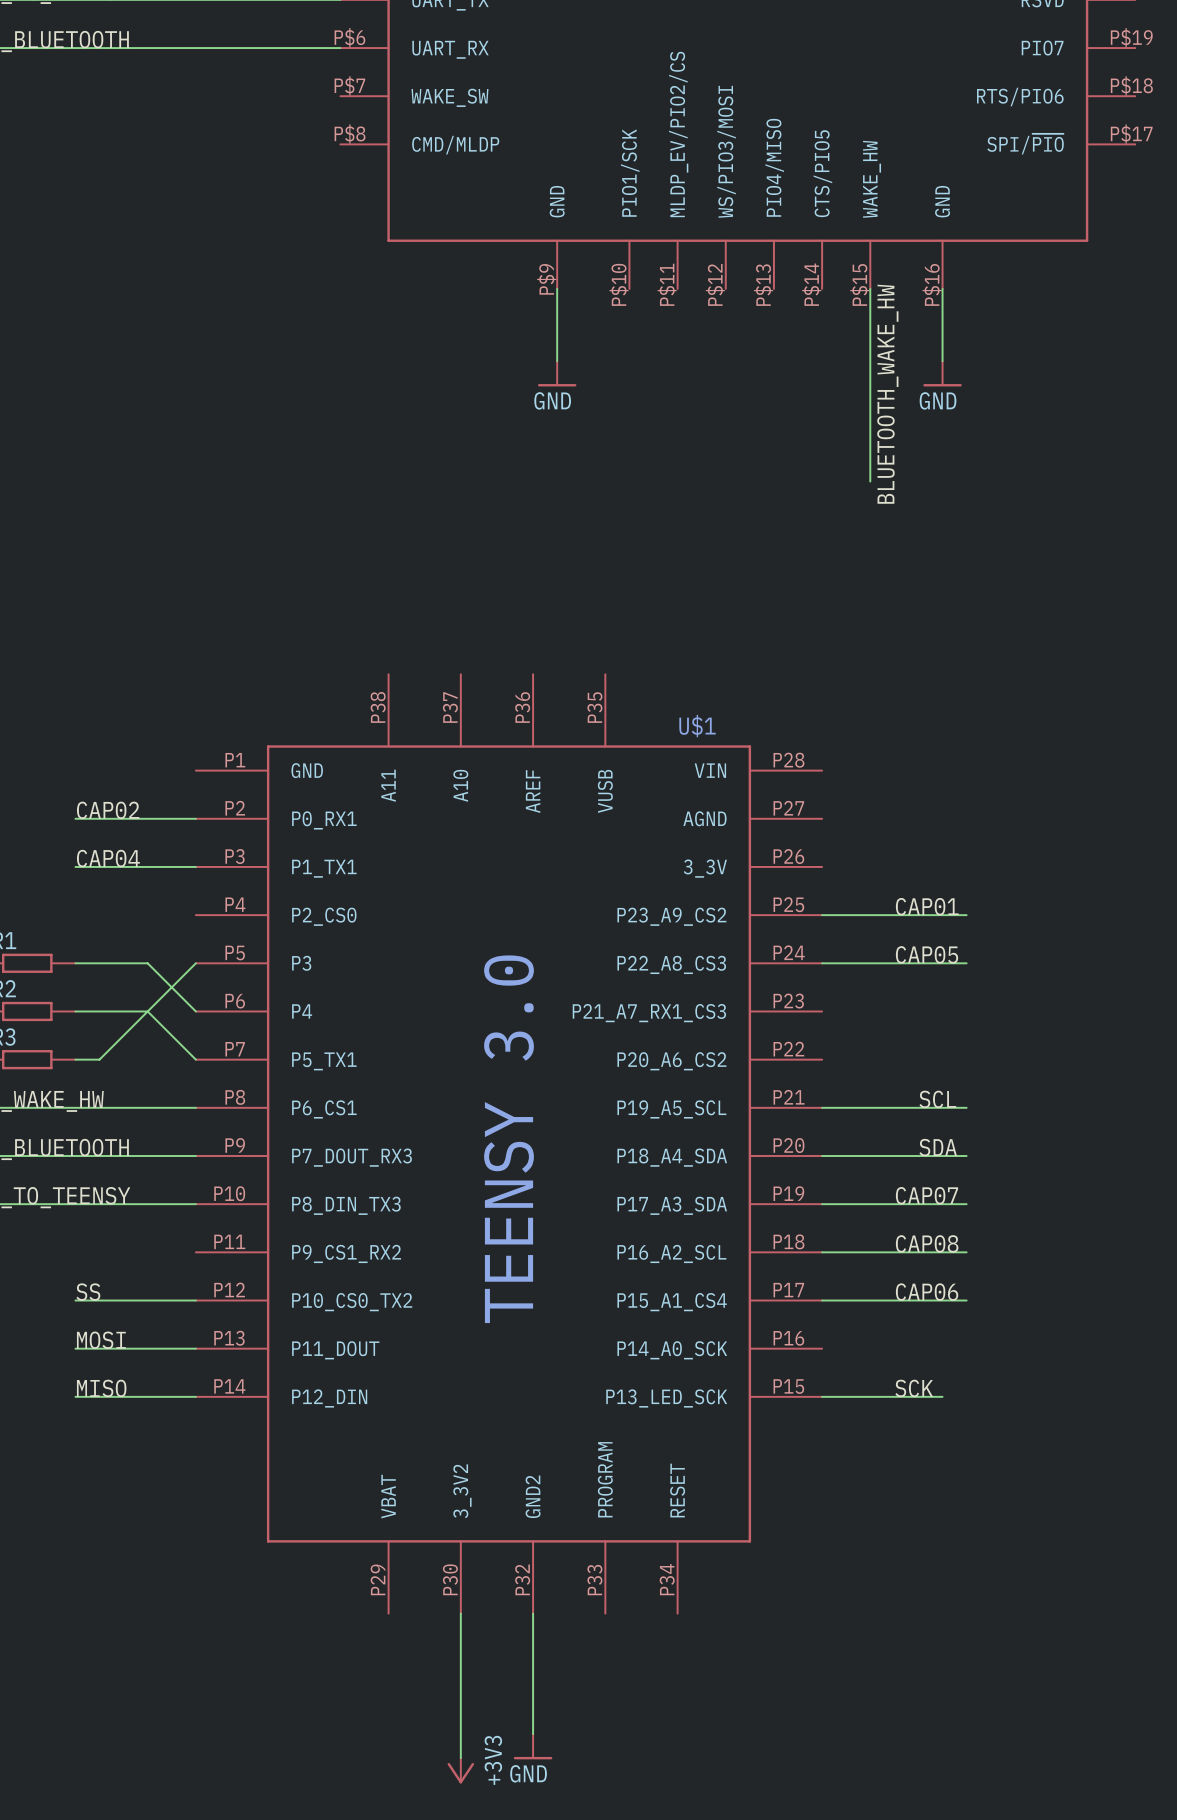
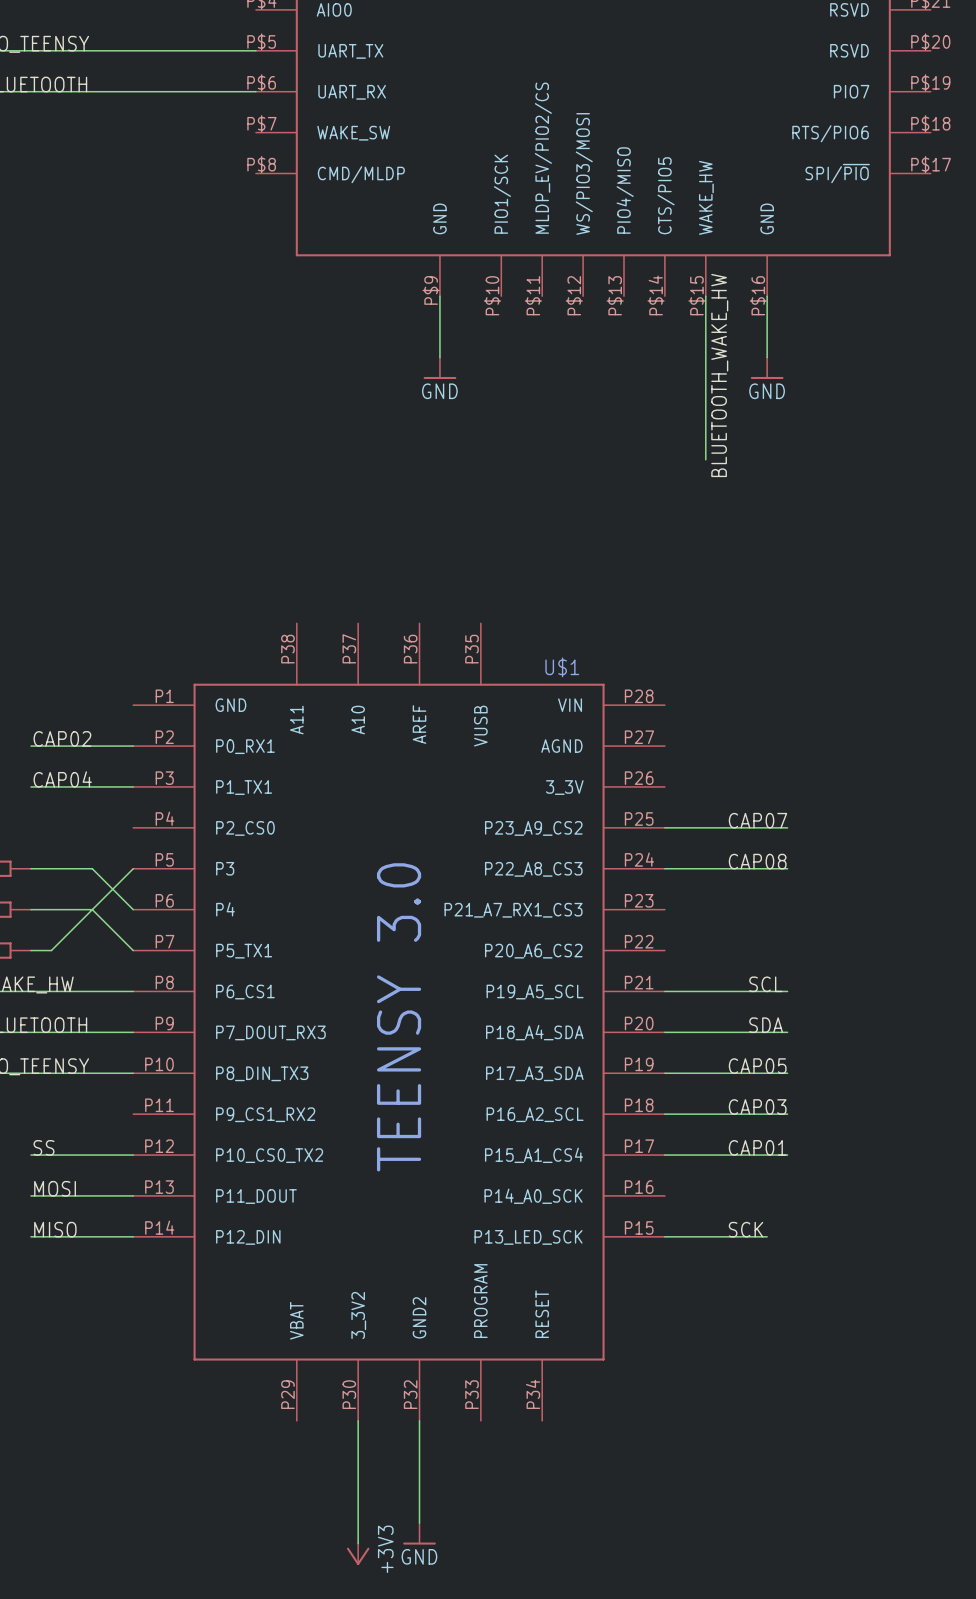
label: CAP01 (927, 906) -> CAP07 (757, 820)
label: CAP05 (927, 954) -> CAP08 (757, 861)
label: CAP07 (927, 1195) -> CAP05 (757, 1066)
label: CAP08 (927, 1243) -> CAP03 (757, 1106)
label: CAP06 (927, 1292) -> CAP01 (757, 1147)

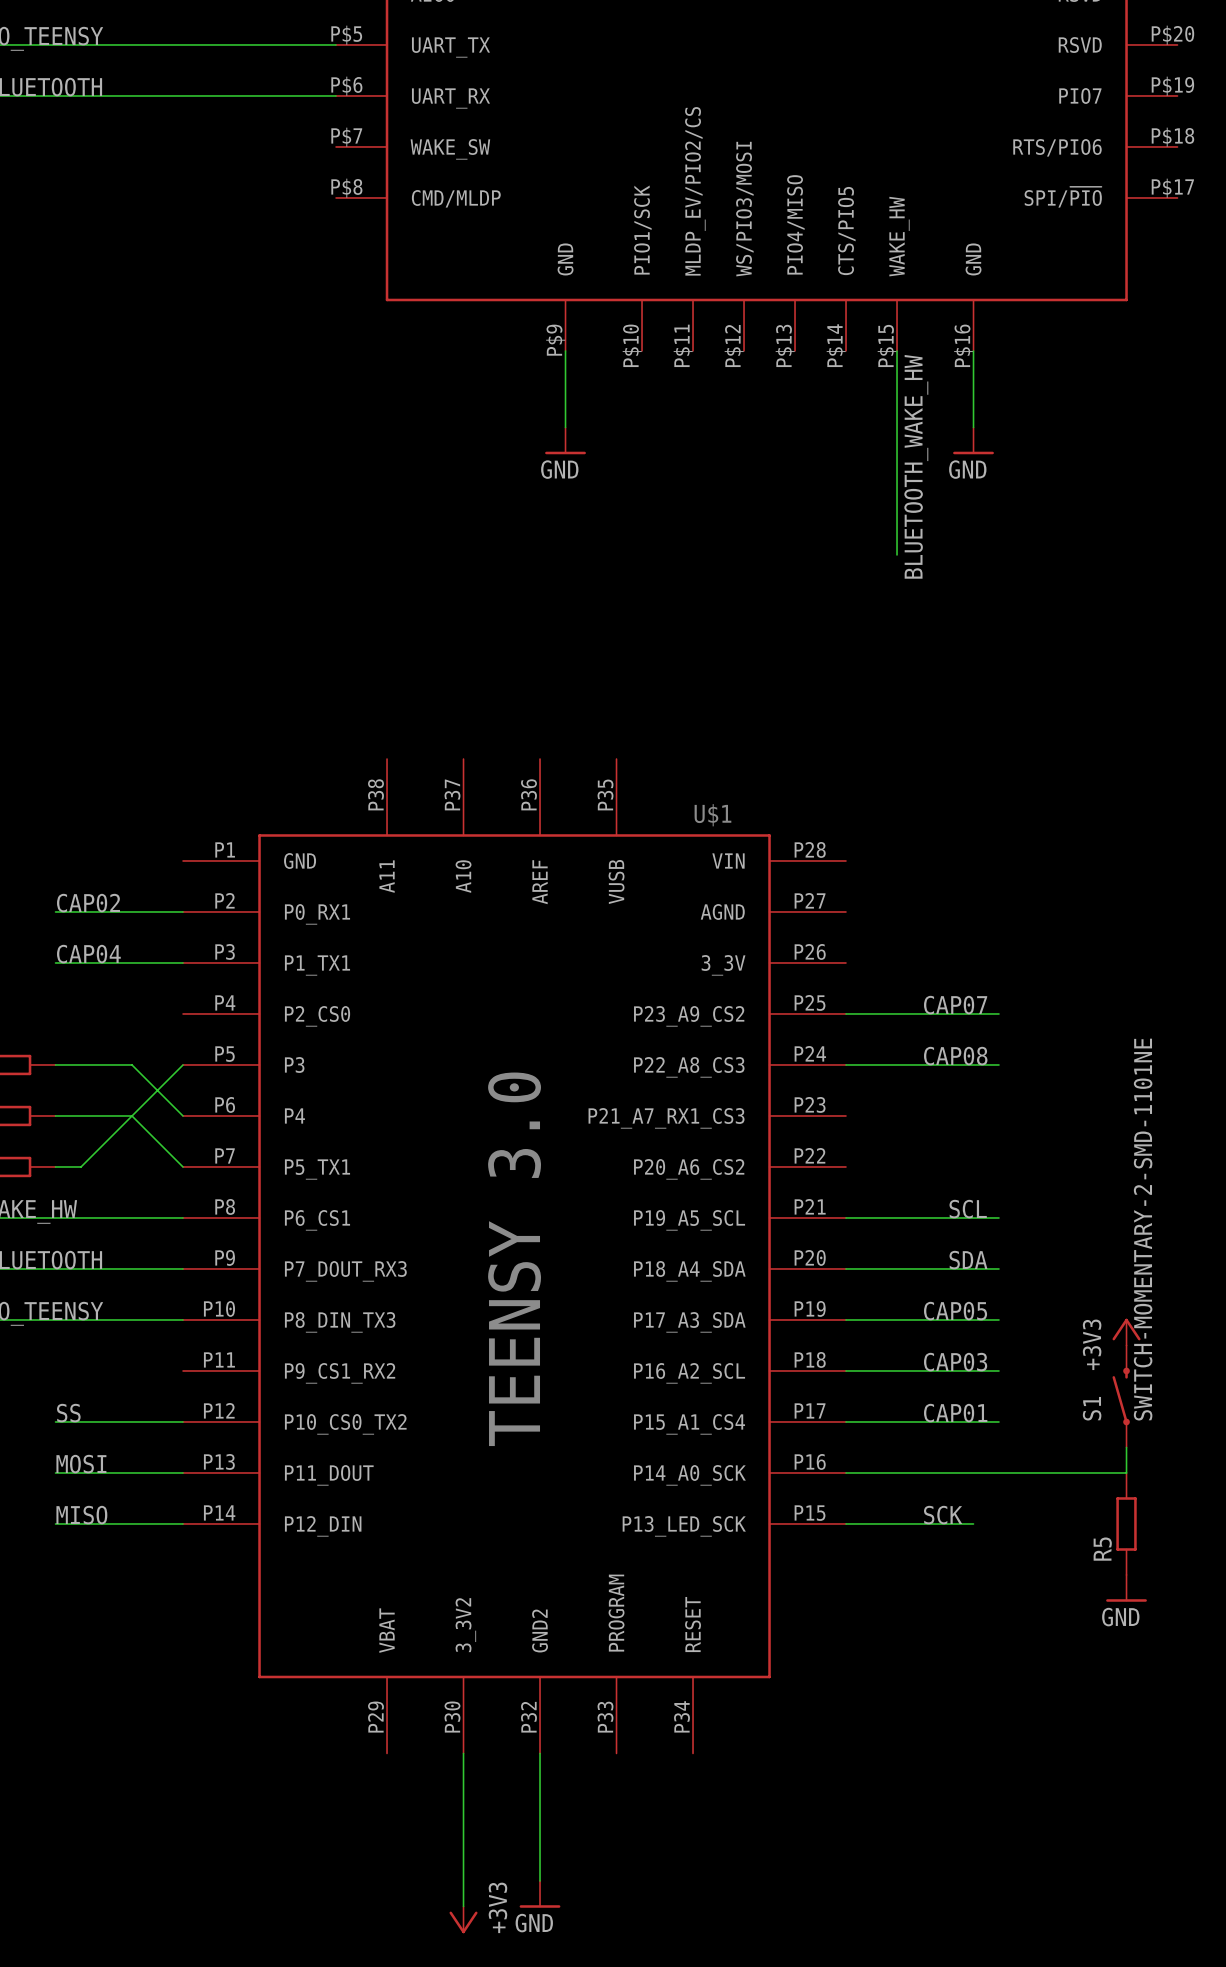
power symbol: none -> +3V3 (1126, 1332)
S1: none -> SWITCH-MOMENTARY-2-SMD-1101NE (1121, 1396)
wire: none -> (1126, 1447) (1126, 1472) (846, 1472)
R5: none -> (1126, 1523)
power symbol: none -> GND (1126, 1588)

